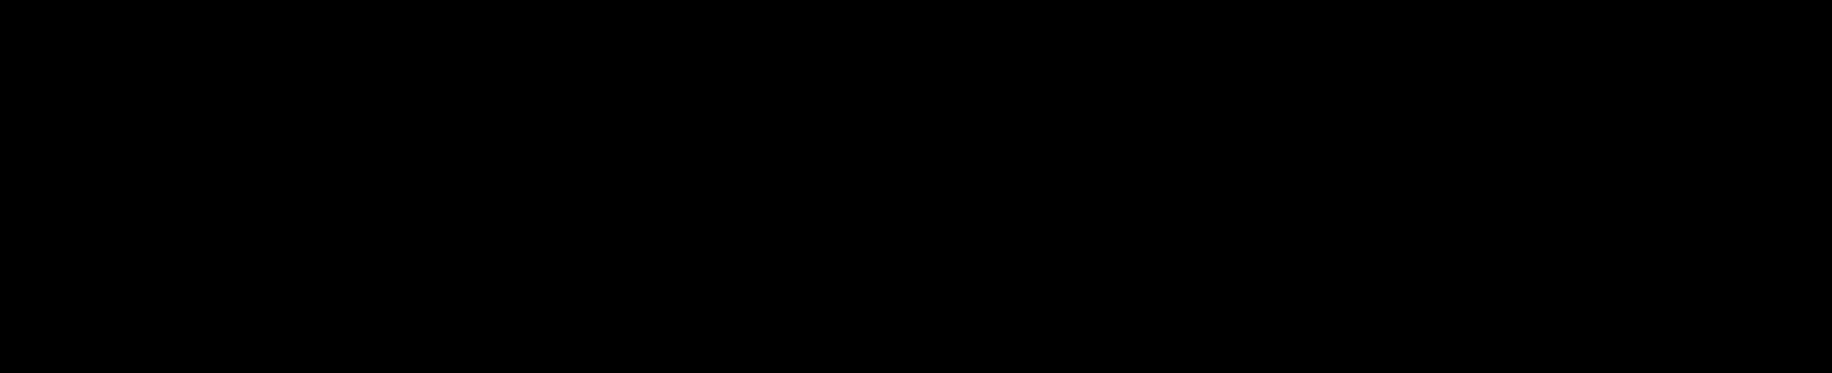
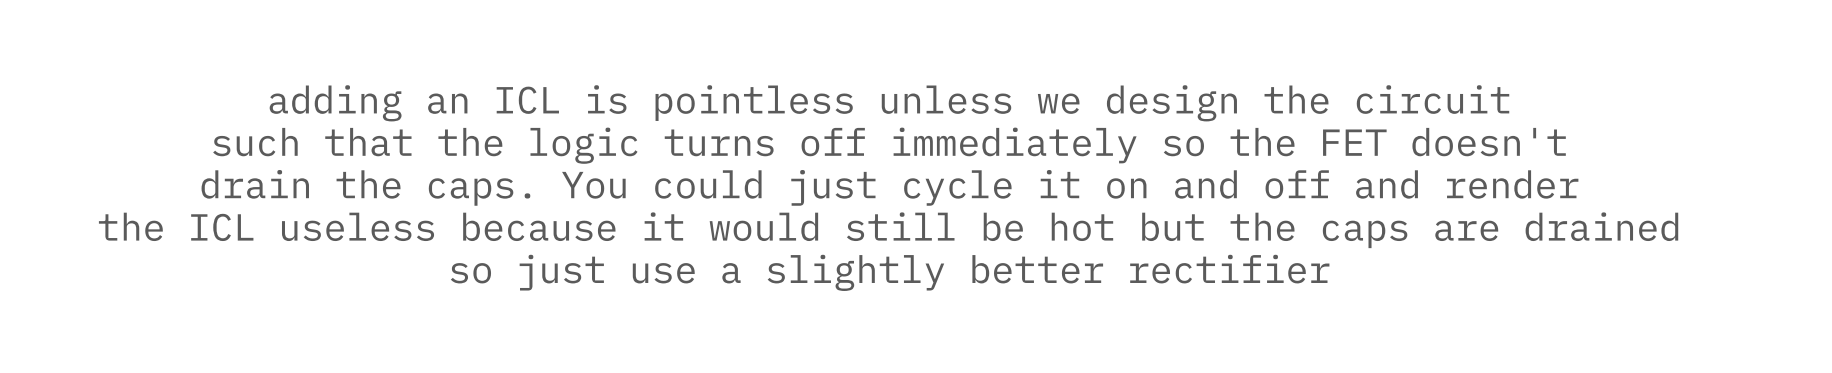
text: none -> adding an ICL is pointless unless we design the circuit (889, 103)
text: none -> such that the logic turns off immediately so the FET doesn't (889, 145)
text: none -> drain the caps. You could just cycle it on and off and render (889, 187)
text: none -> the ICL useless because it would still be hot but the caps are drained (888, 230)
text: none -> so just use a slightly better rectifier (890, 272)

